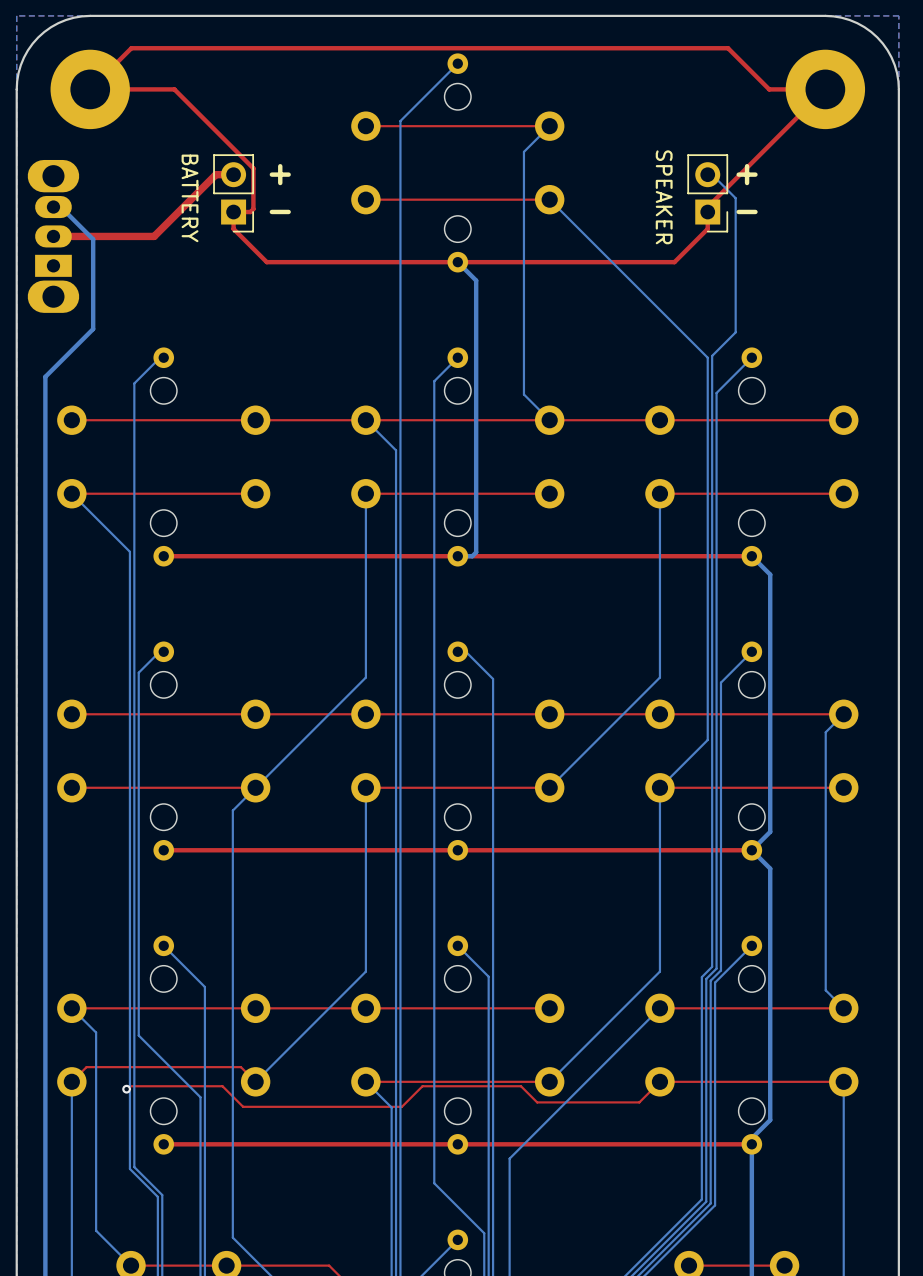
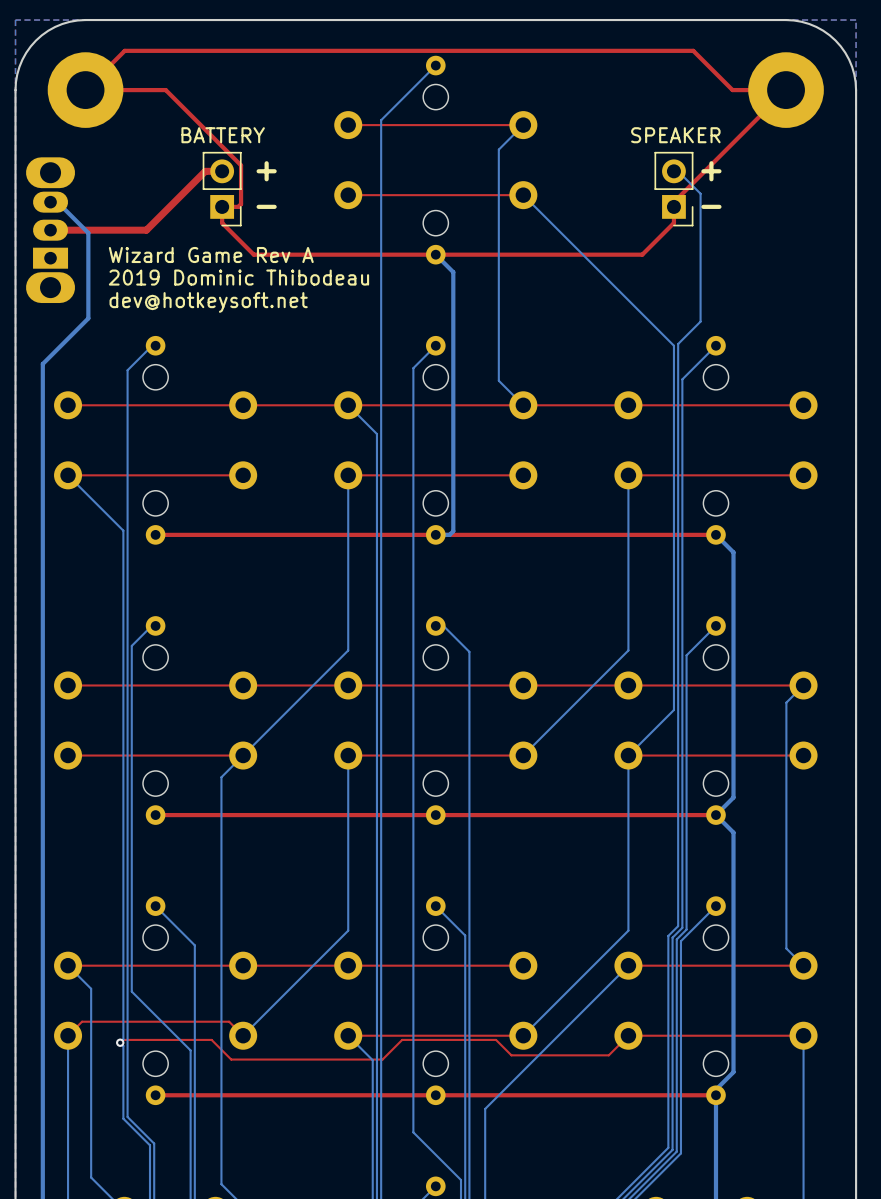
part value rotation: 0° (664, 197) -> 90° counterclockwise (675, 135)
part value rotation: 0° (190, 198) -> 90° counterclockwise (223, 135)
text: none -> Wizard Game Rev A (211, 255)
text: none -> 2019 Dominic Thibodeau (238, 277)
text: none -> dev@hotkeysoft.net (208, 302)

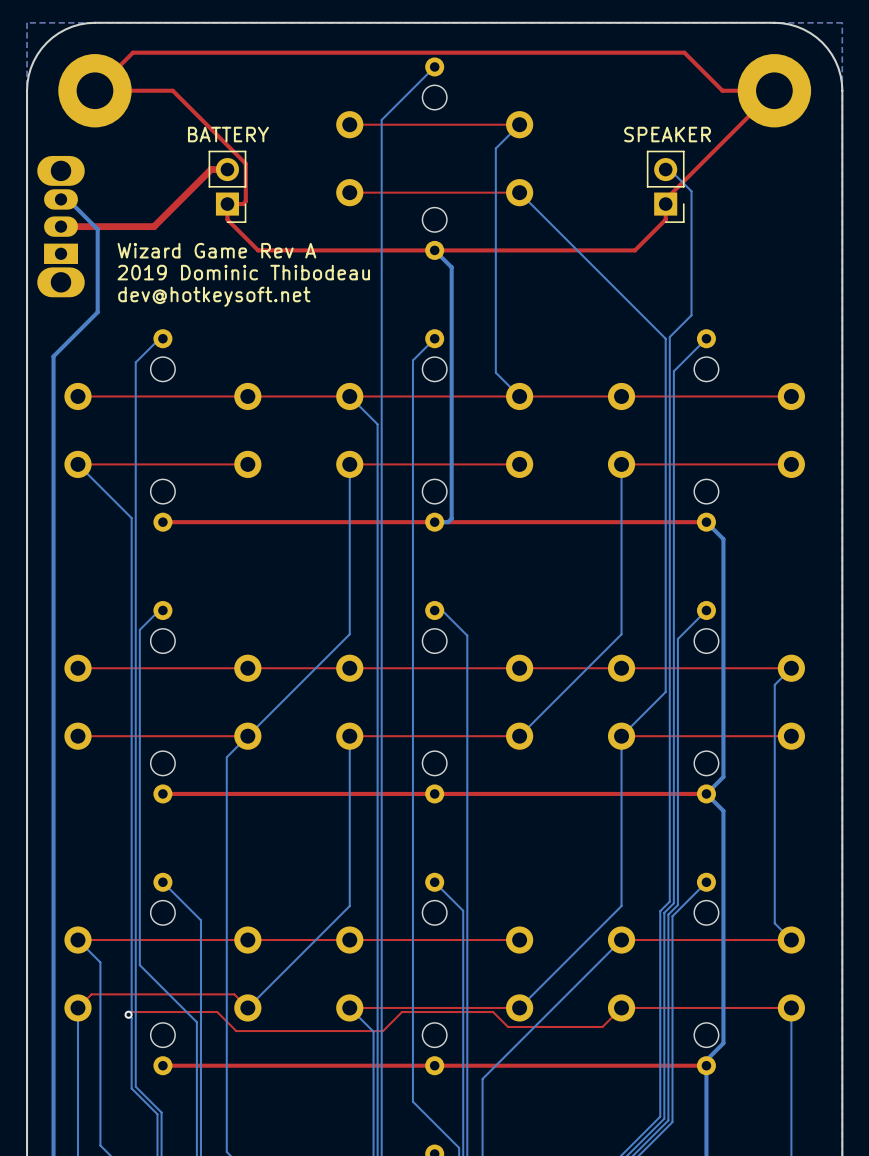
text: + (266, 171) -> none
text: + (711, 171) -> none
text: - (266, 206) -> none
text: - (711, 206) -> none

